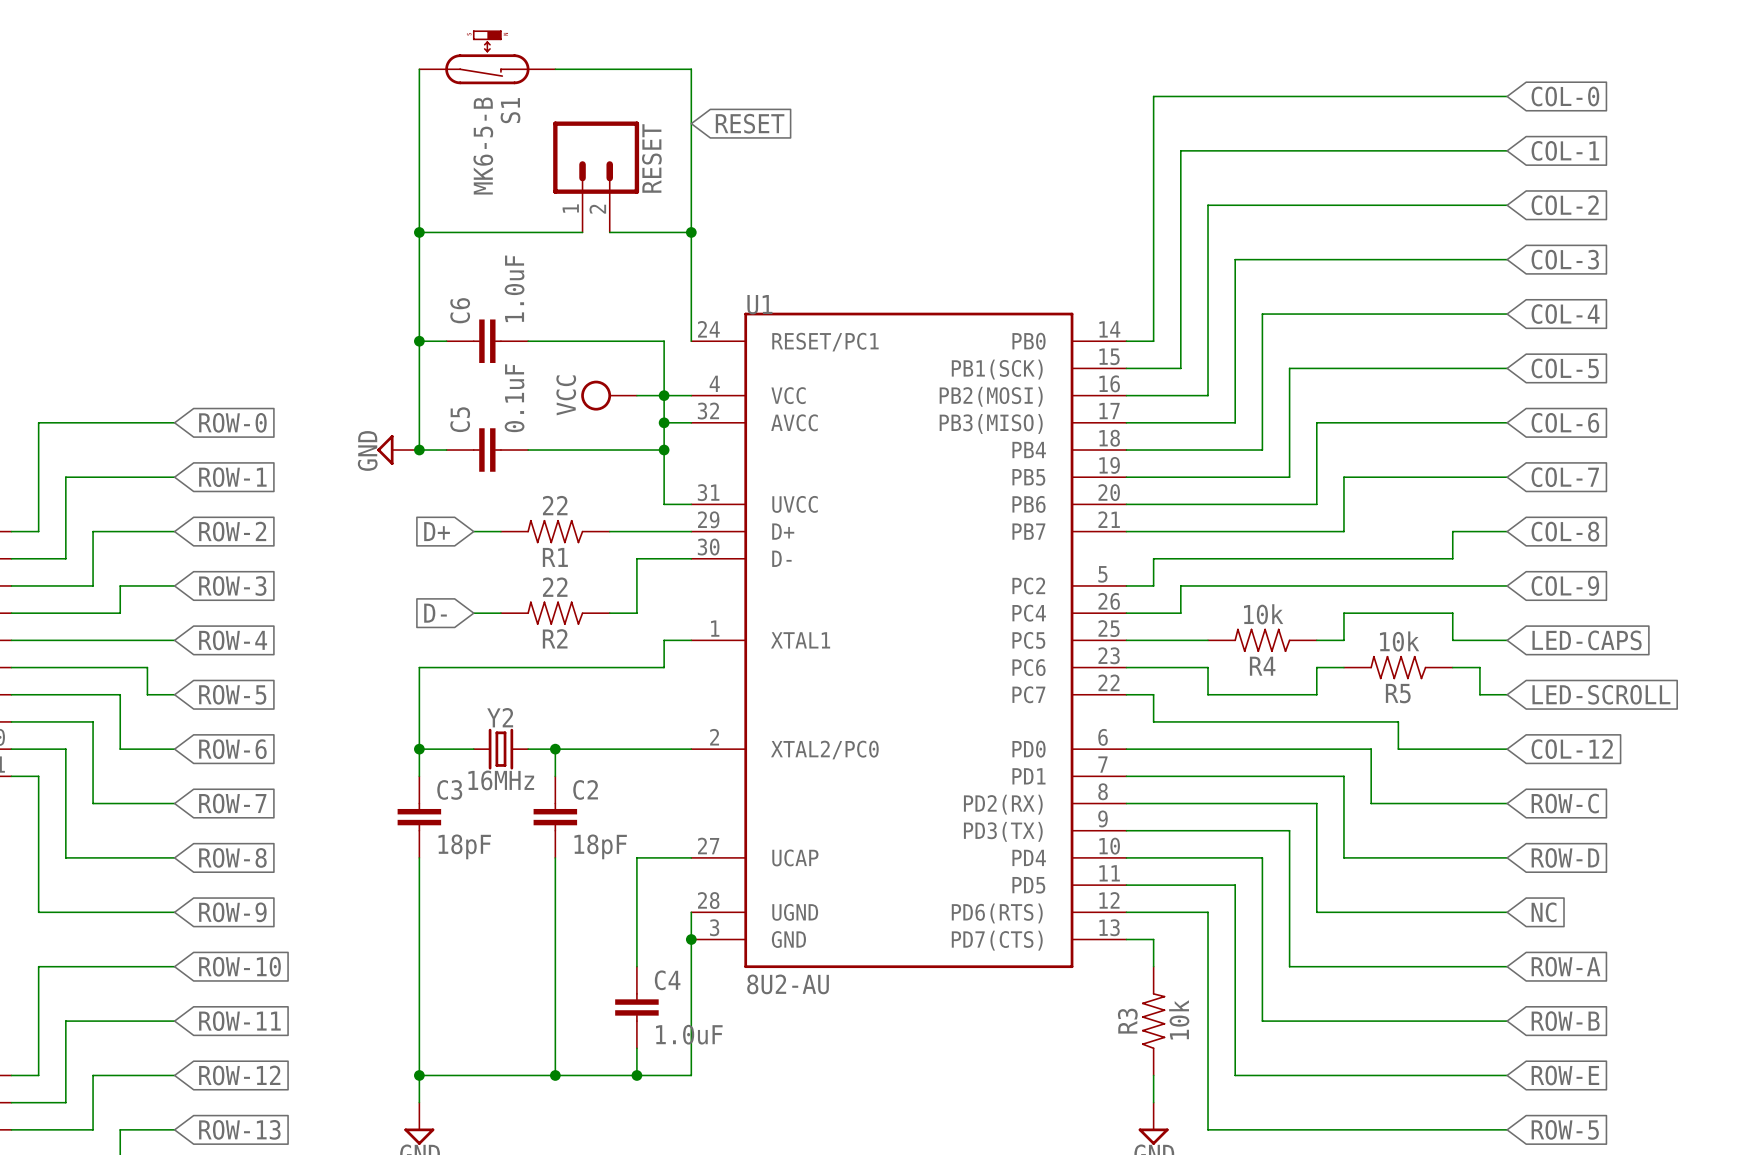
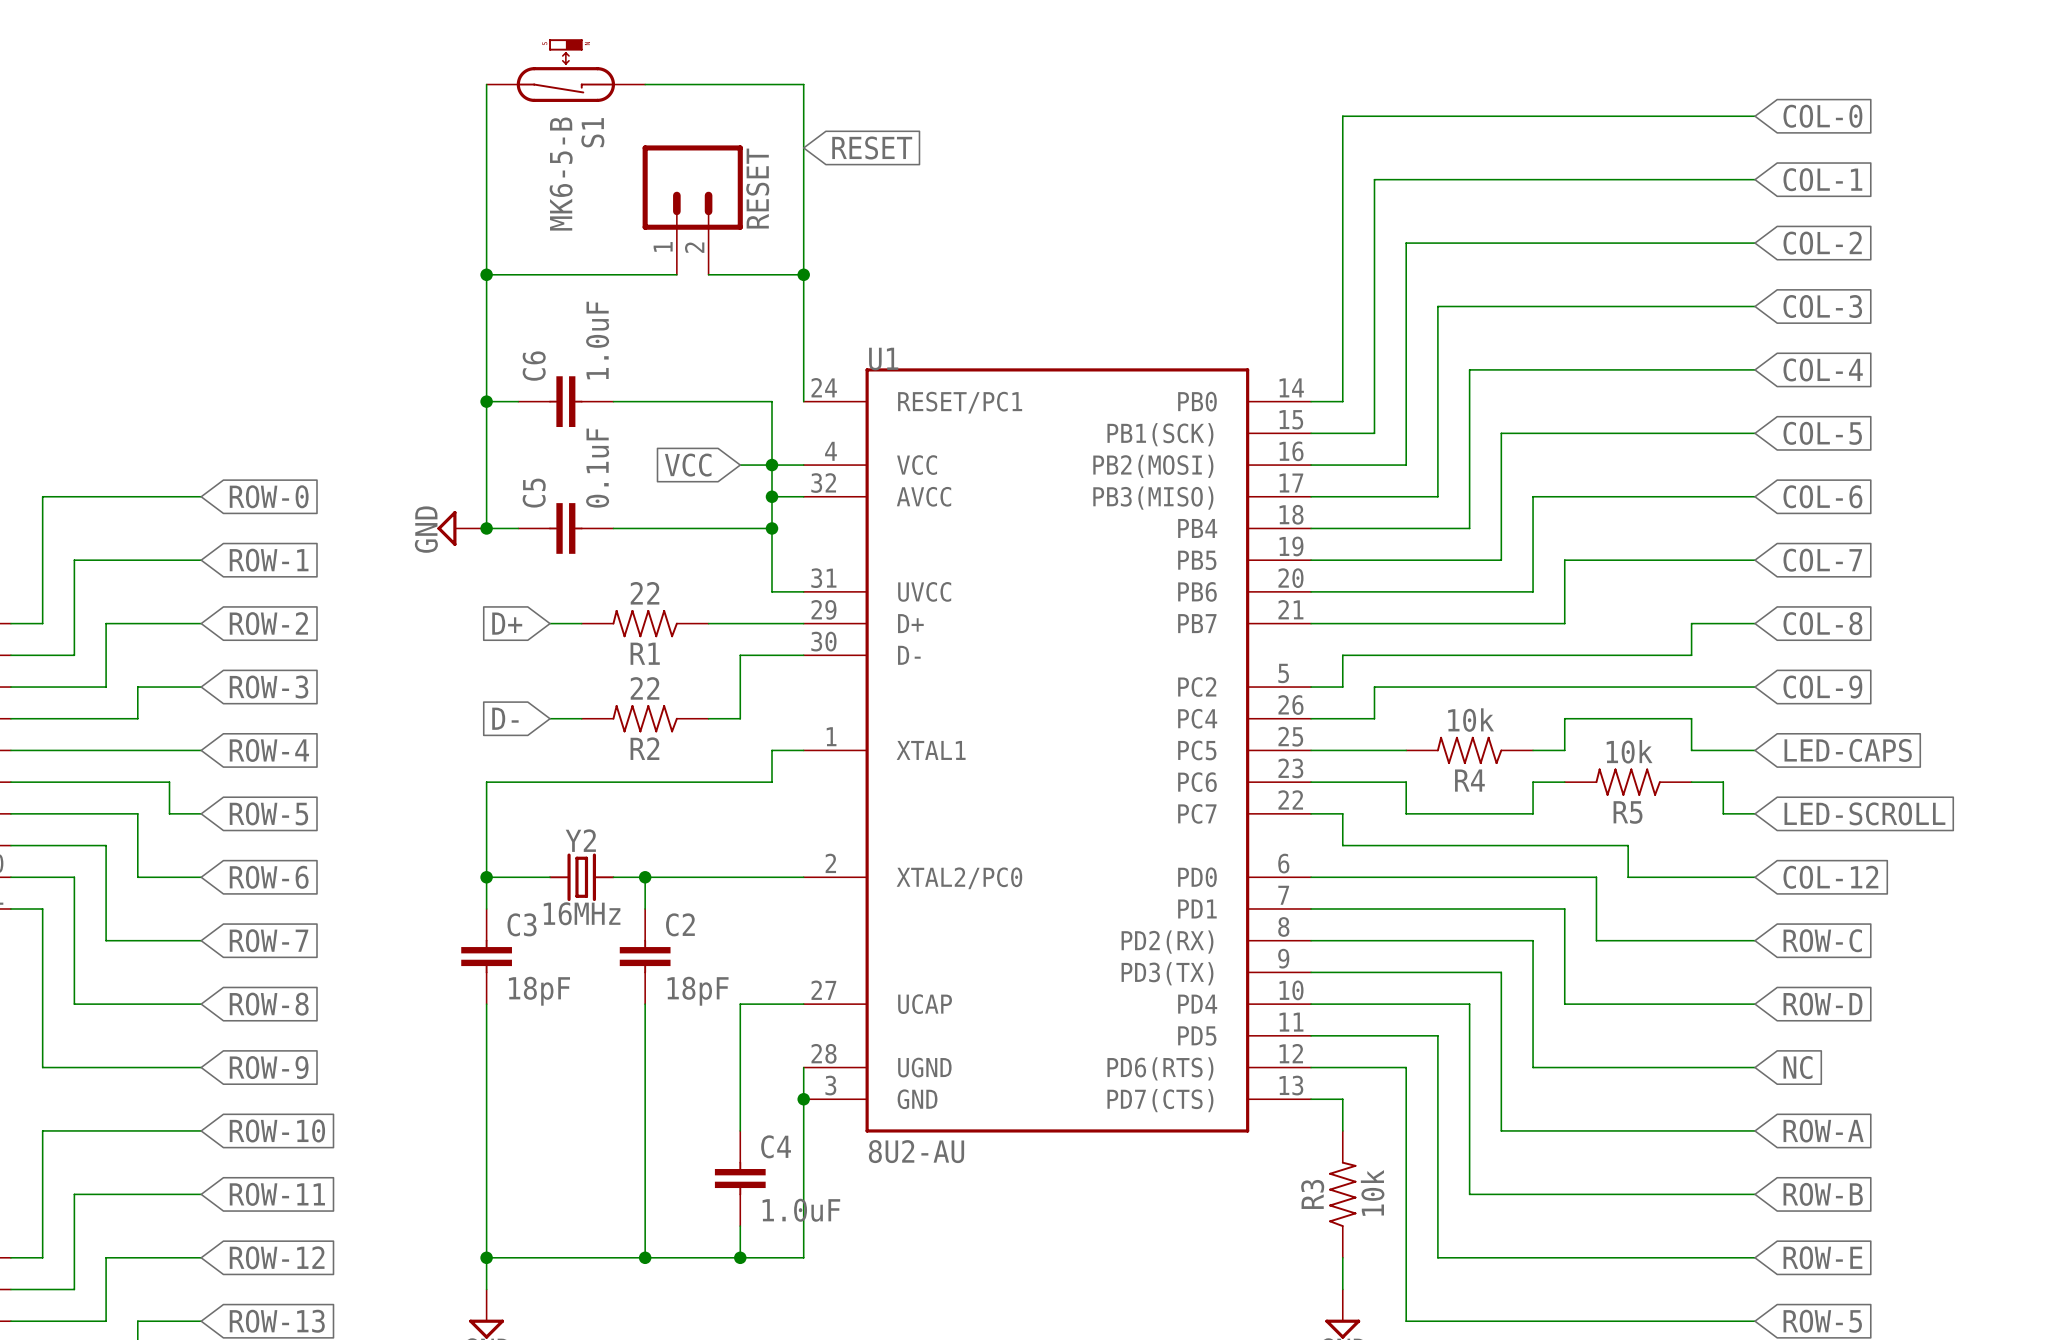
global label: none -> VCC (688, 465)
power symbol: VCC (609, 395) -> none

